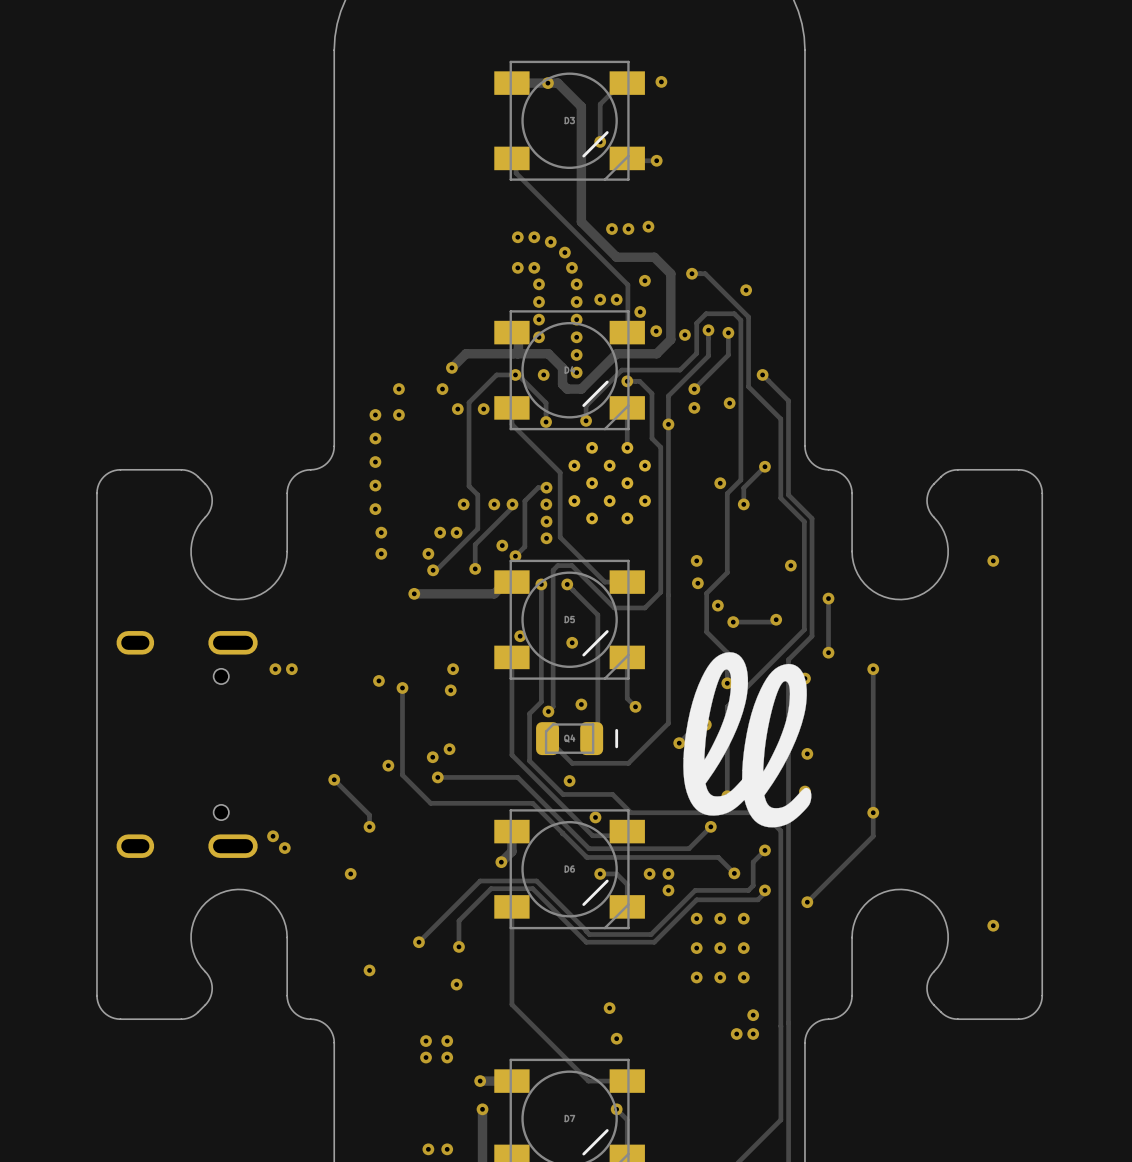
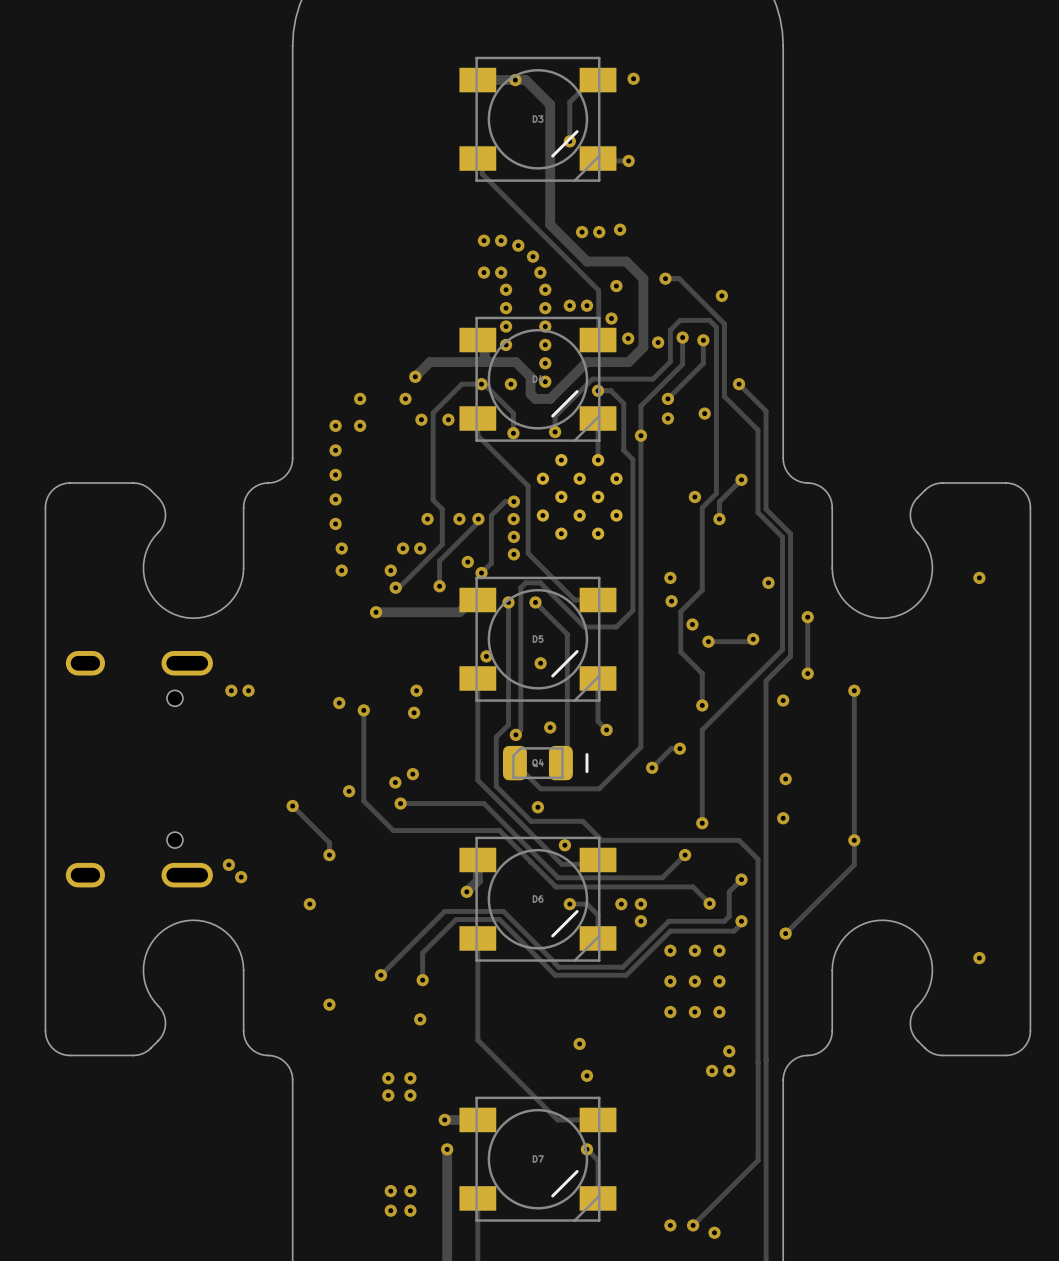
drawing: [683, 652, 812, 828] -> none

